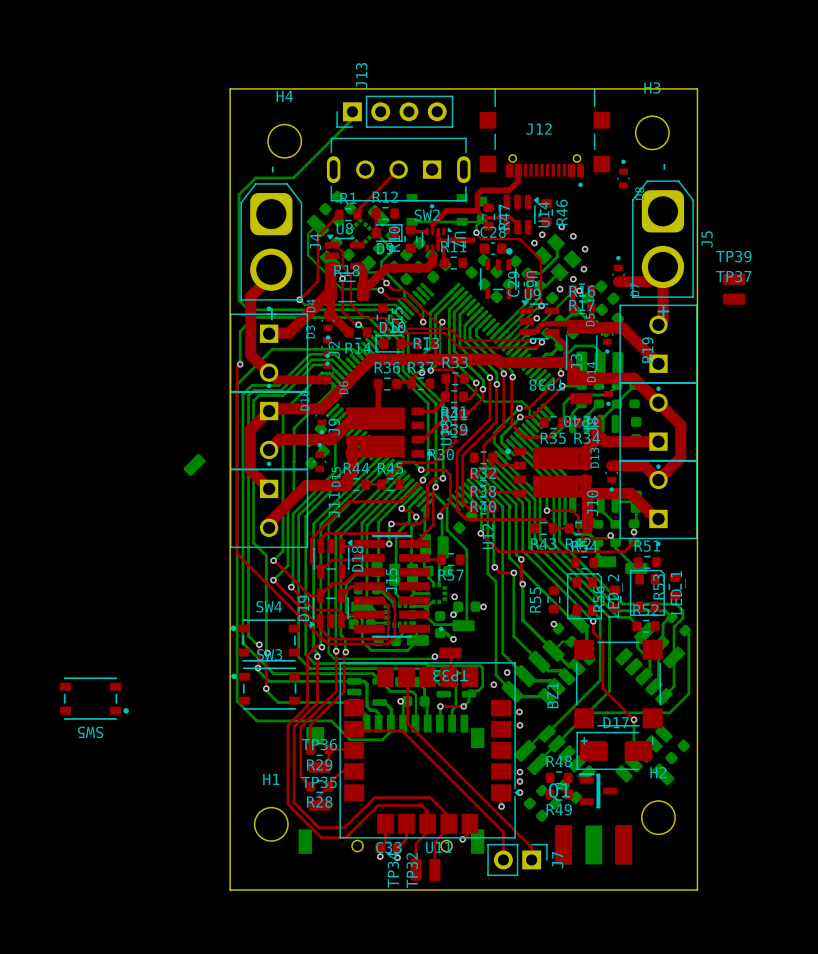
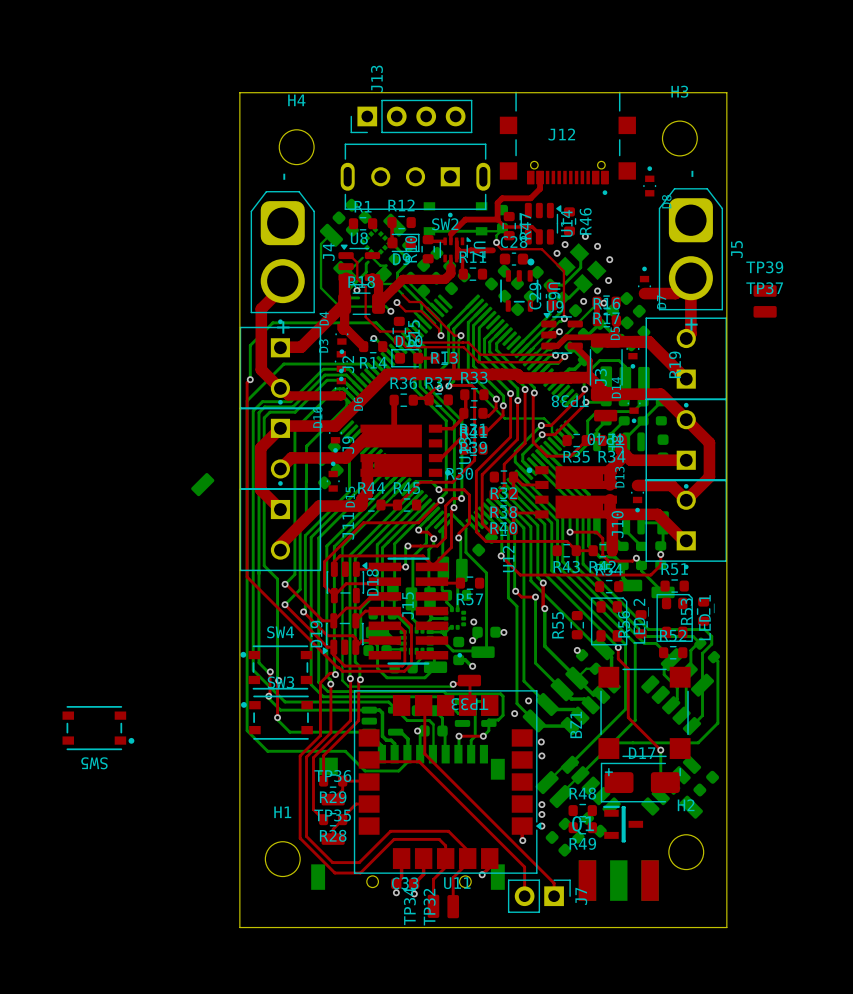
bottom track: (352, 111) (352, 119) (293, 177) (255, 177) (239, 194) (239, 300) (248, 309) (261, 309) -> none
top track: (398, 169) (357, 210) (357, 214) -> none
top track: (338, 214) (318, 235) (318, 281) (299, 299) -> none
bottom track: none -> (362, 257) (351, 269) (351, 274)
bottom track: none -> (372, 257) (380, 265) (386, 265) (371, 280)
part: (342, 248) -> none
bottom track: none -> (368, 261) (366, 263) (366, 272) (348, 289) (340, 289) (348, 297) (358, 297)
bottom track: (308, 255) (341, 289) (380, 290) -> (321, 266) (321, 288) (339, 306) (385, 306) (390, 311)
bottom track: none -> (408, 281) (436, 309)
top track: (342, 278) (342, 311) (354, 323) (358, 324) -> none
via position: (386, 283) -> (390, 311)
bottom track: (299, 299) (304, 304) (395, 304) (403, 313) -> none
via: (299, 299) -> none
bottom track: (360, 309) (392, 309) (399, 316) -> (376, 322) (384, 330)
bottom track: (254, 317) (368, 317) -> (264, 330) (272, 322)

